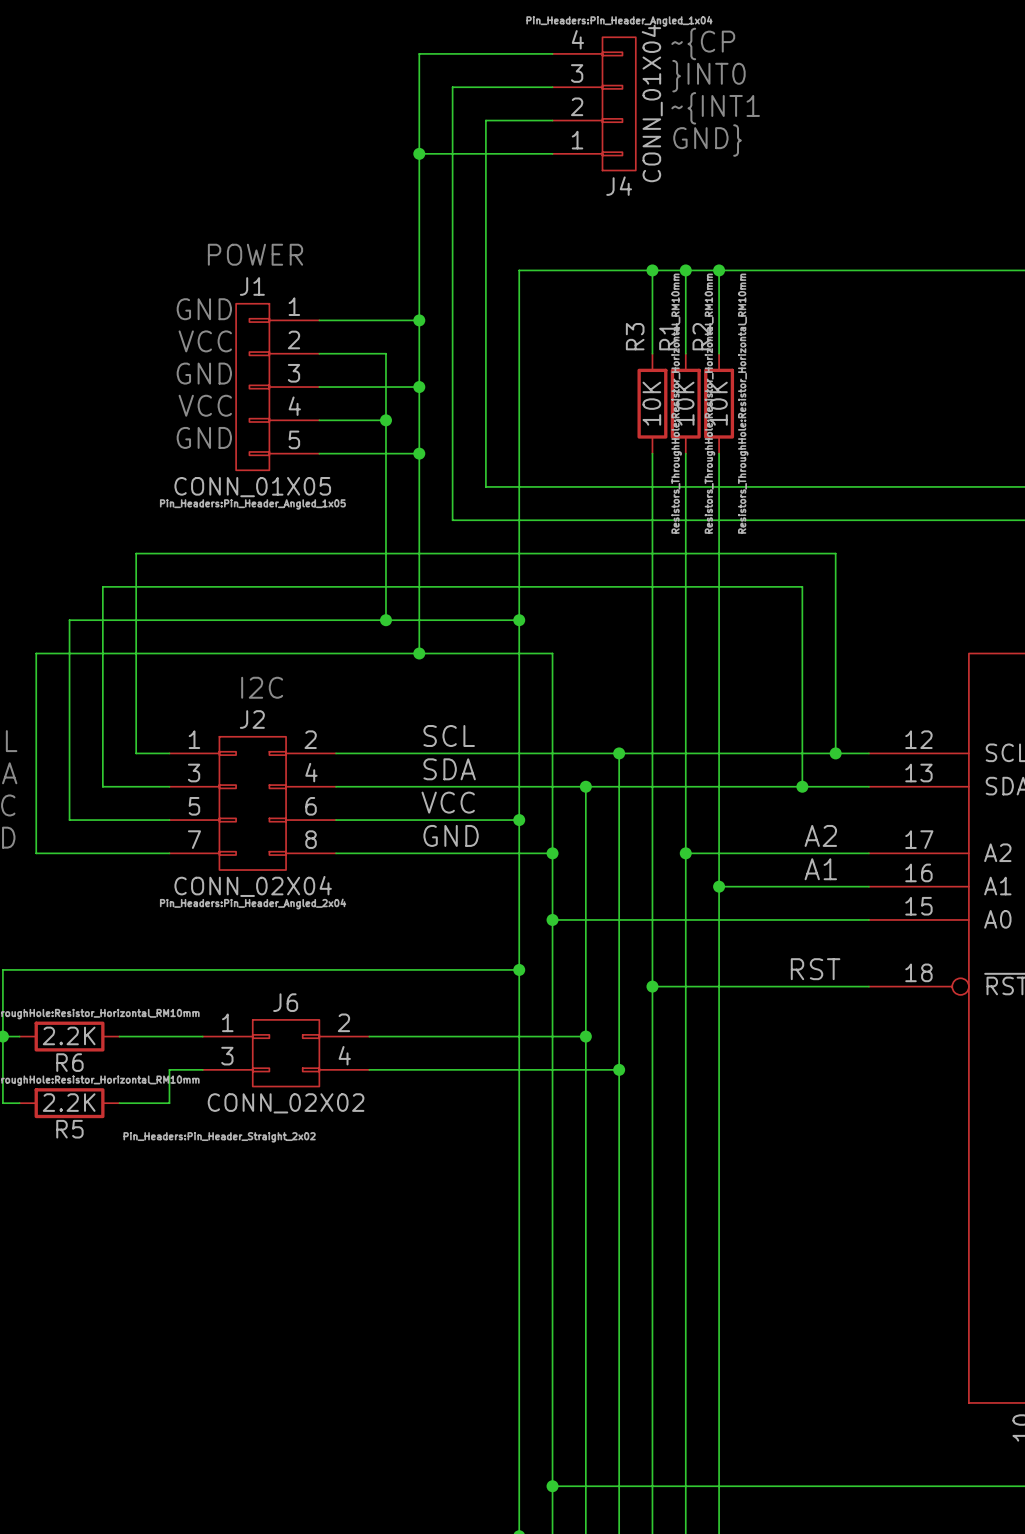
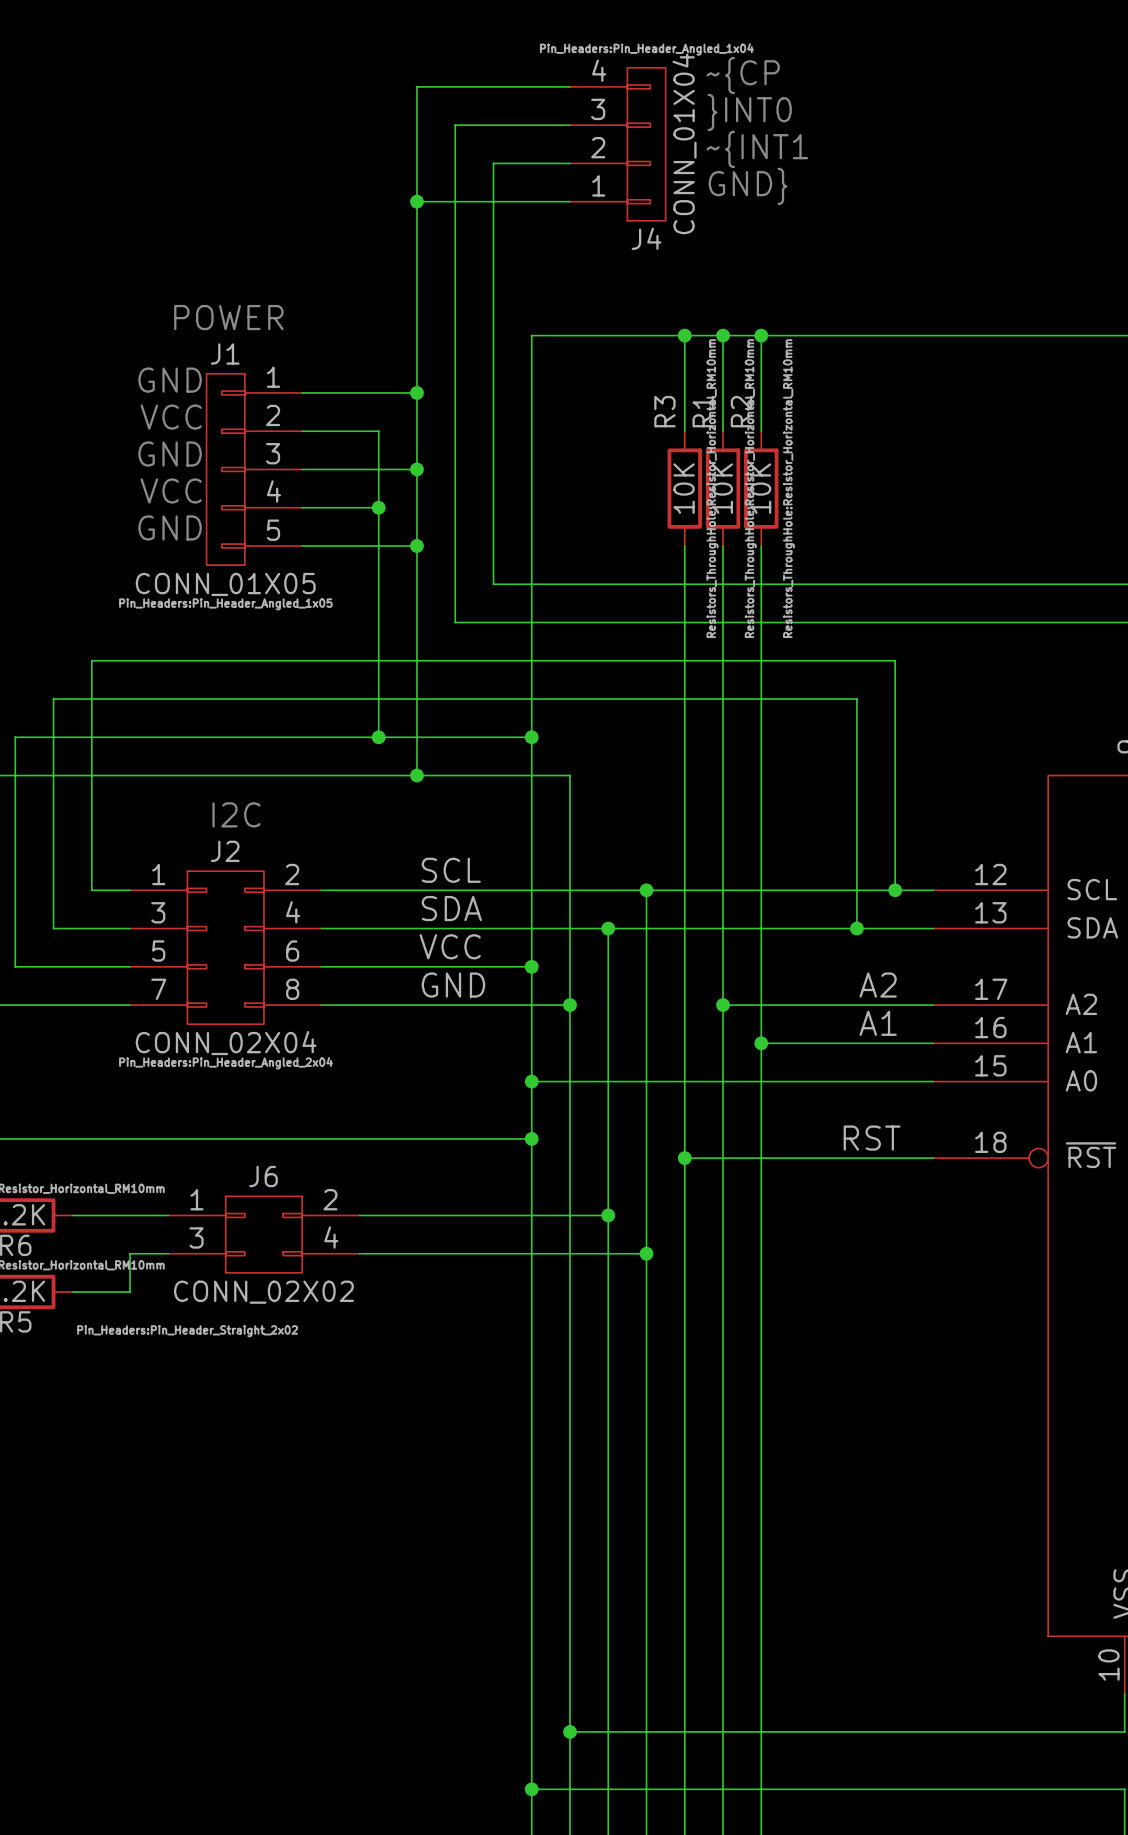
wire: none -> (531, 1081) (570, 1081)
junction position: (552, 919) -> (531, 1081)

